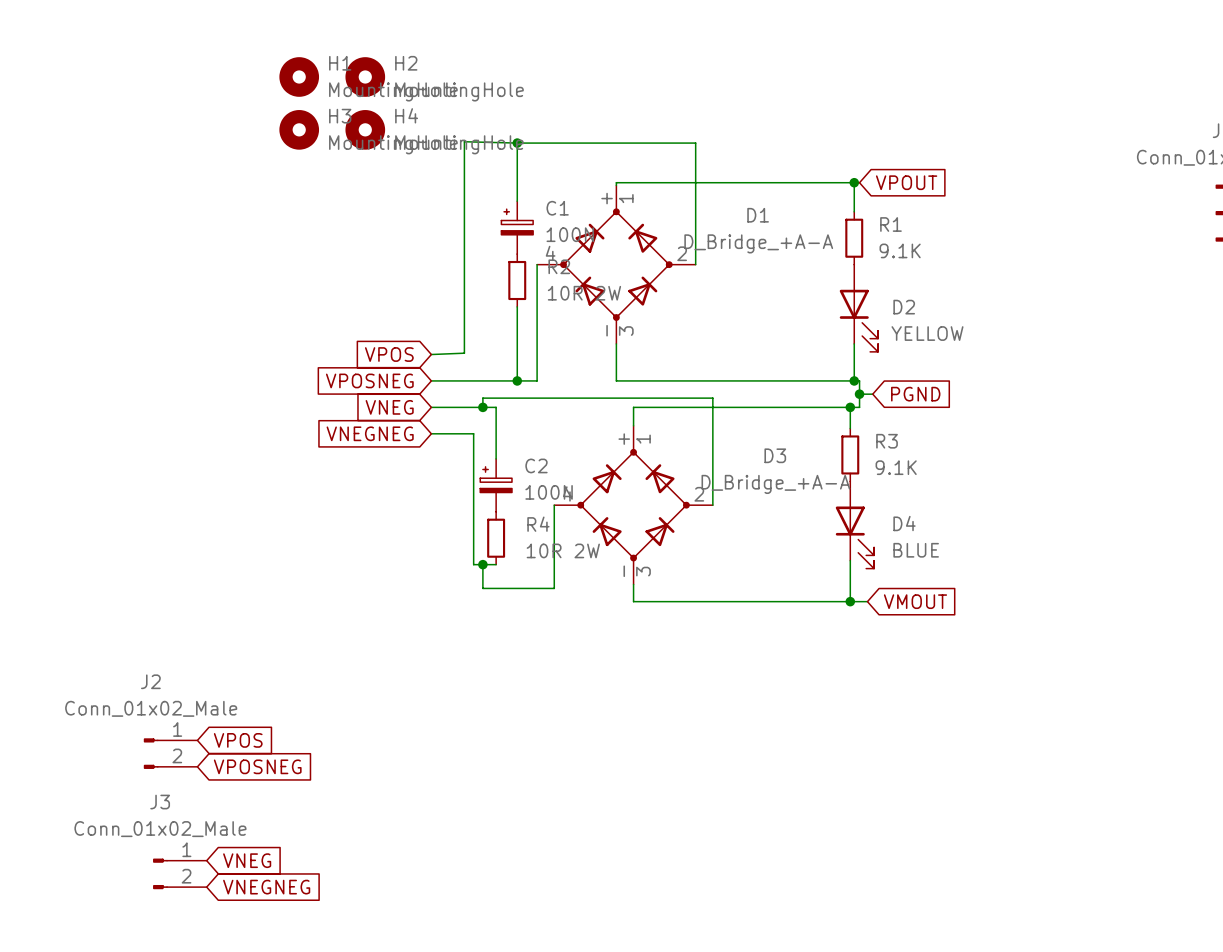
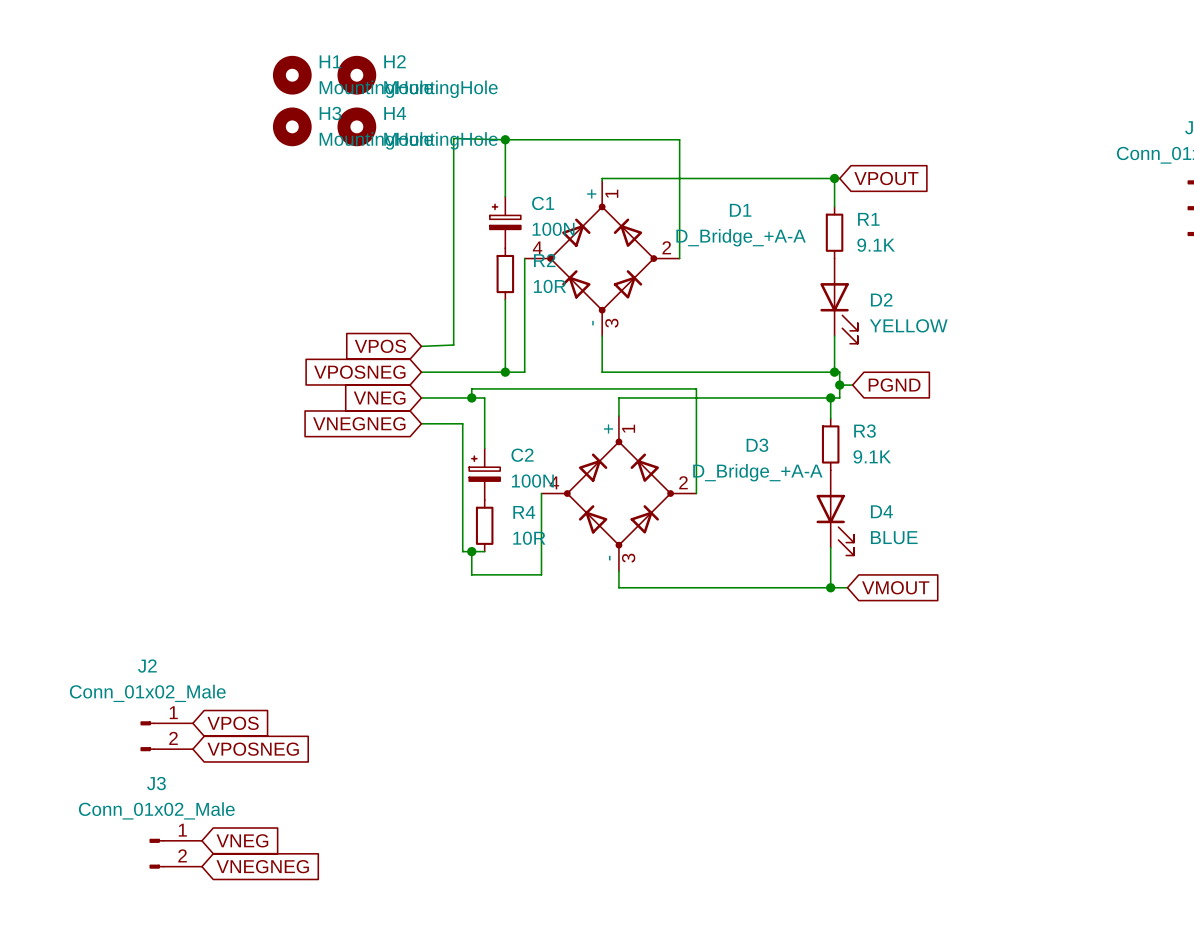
R2 value: 10R 2W (584, 293) -> 10R (549, 286)
R4 value: 10R 2W (563, 550) -> 10R (529, 538)

